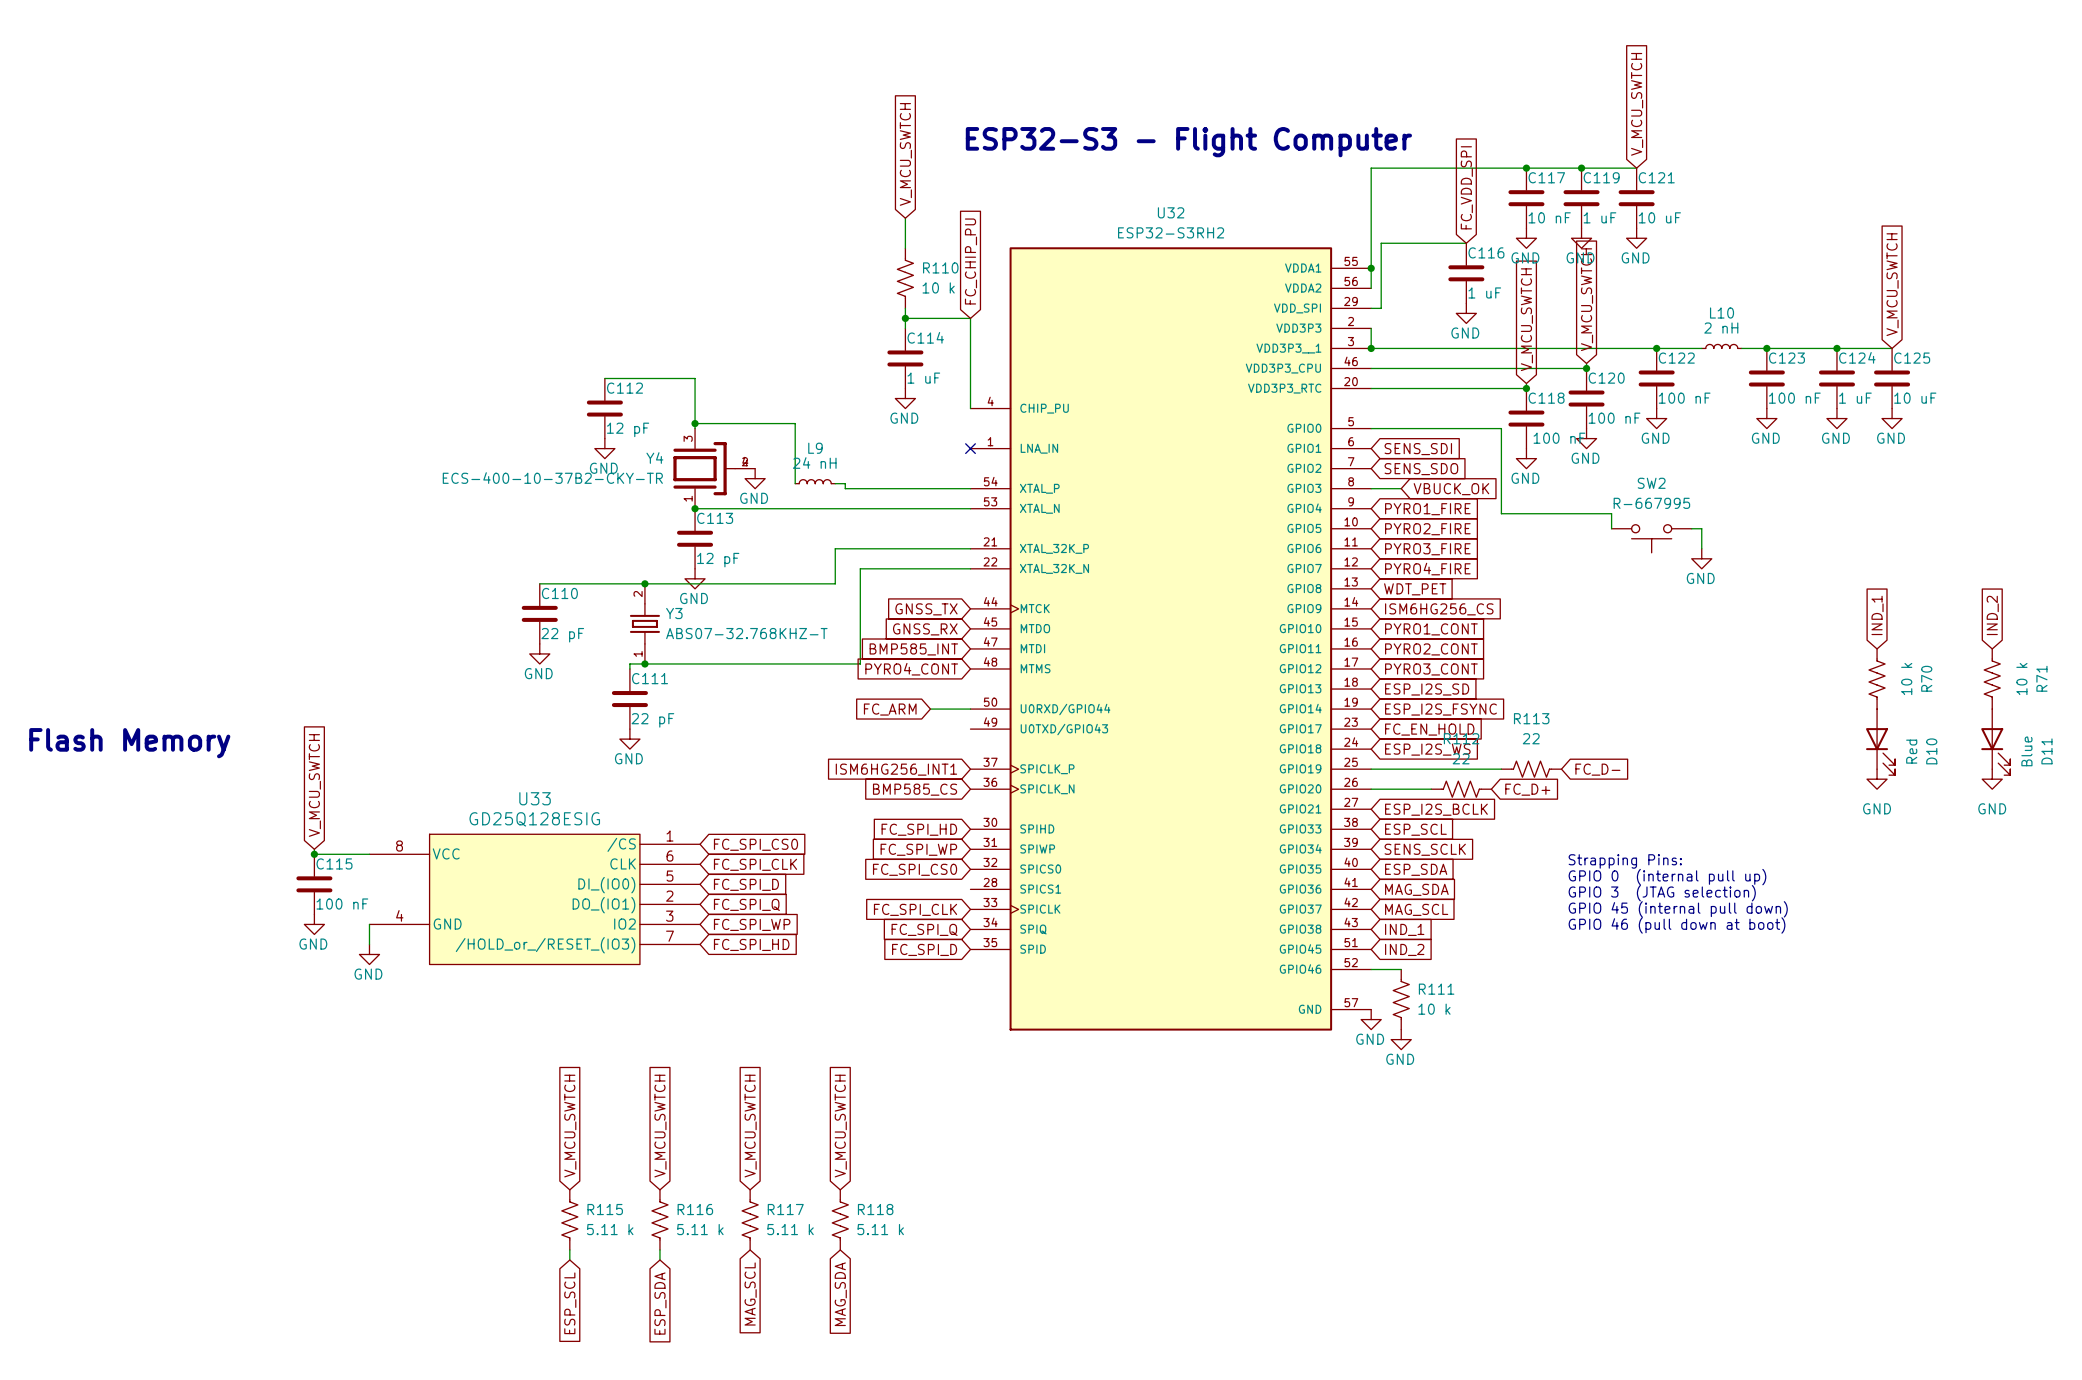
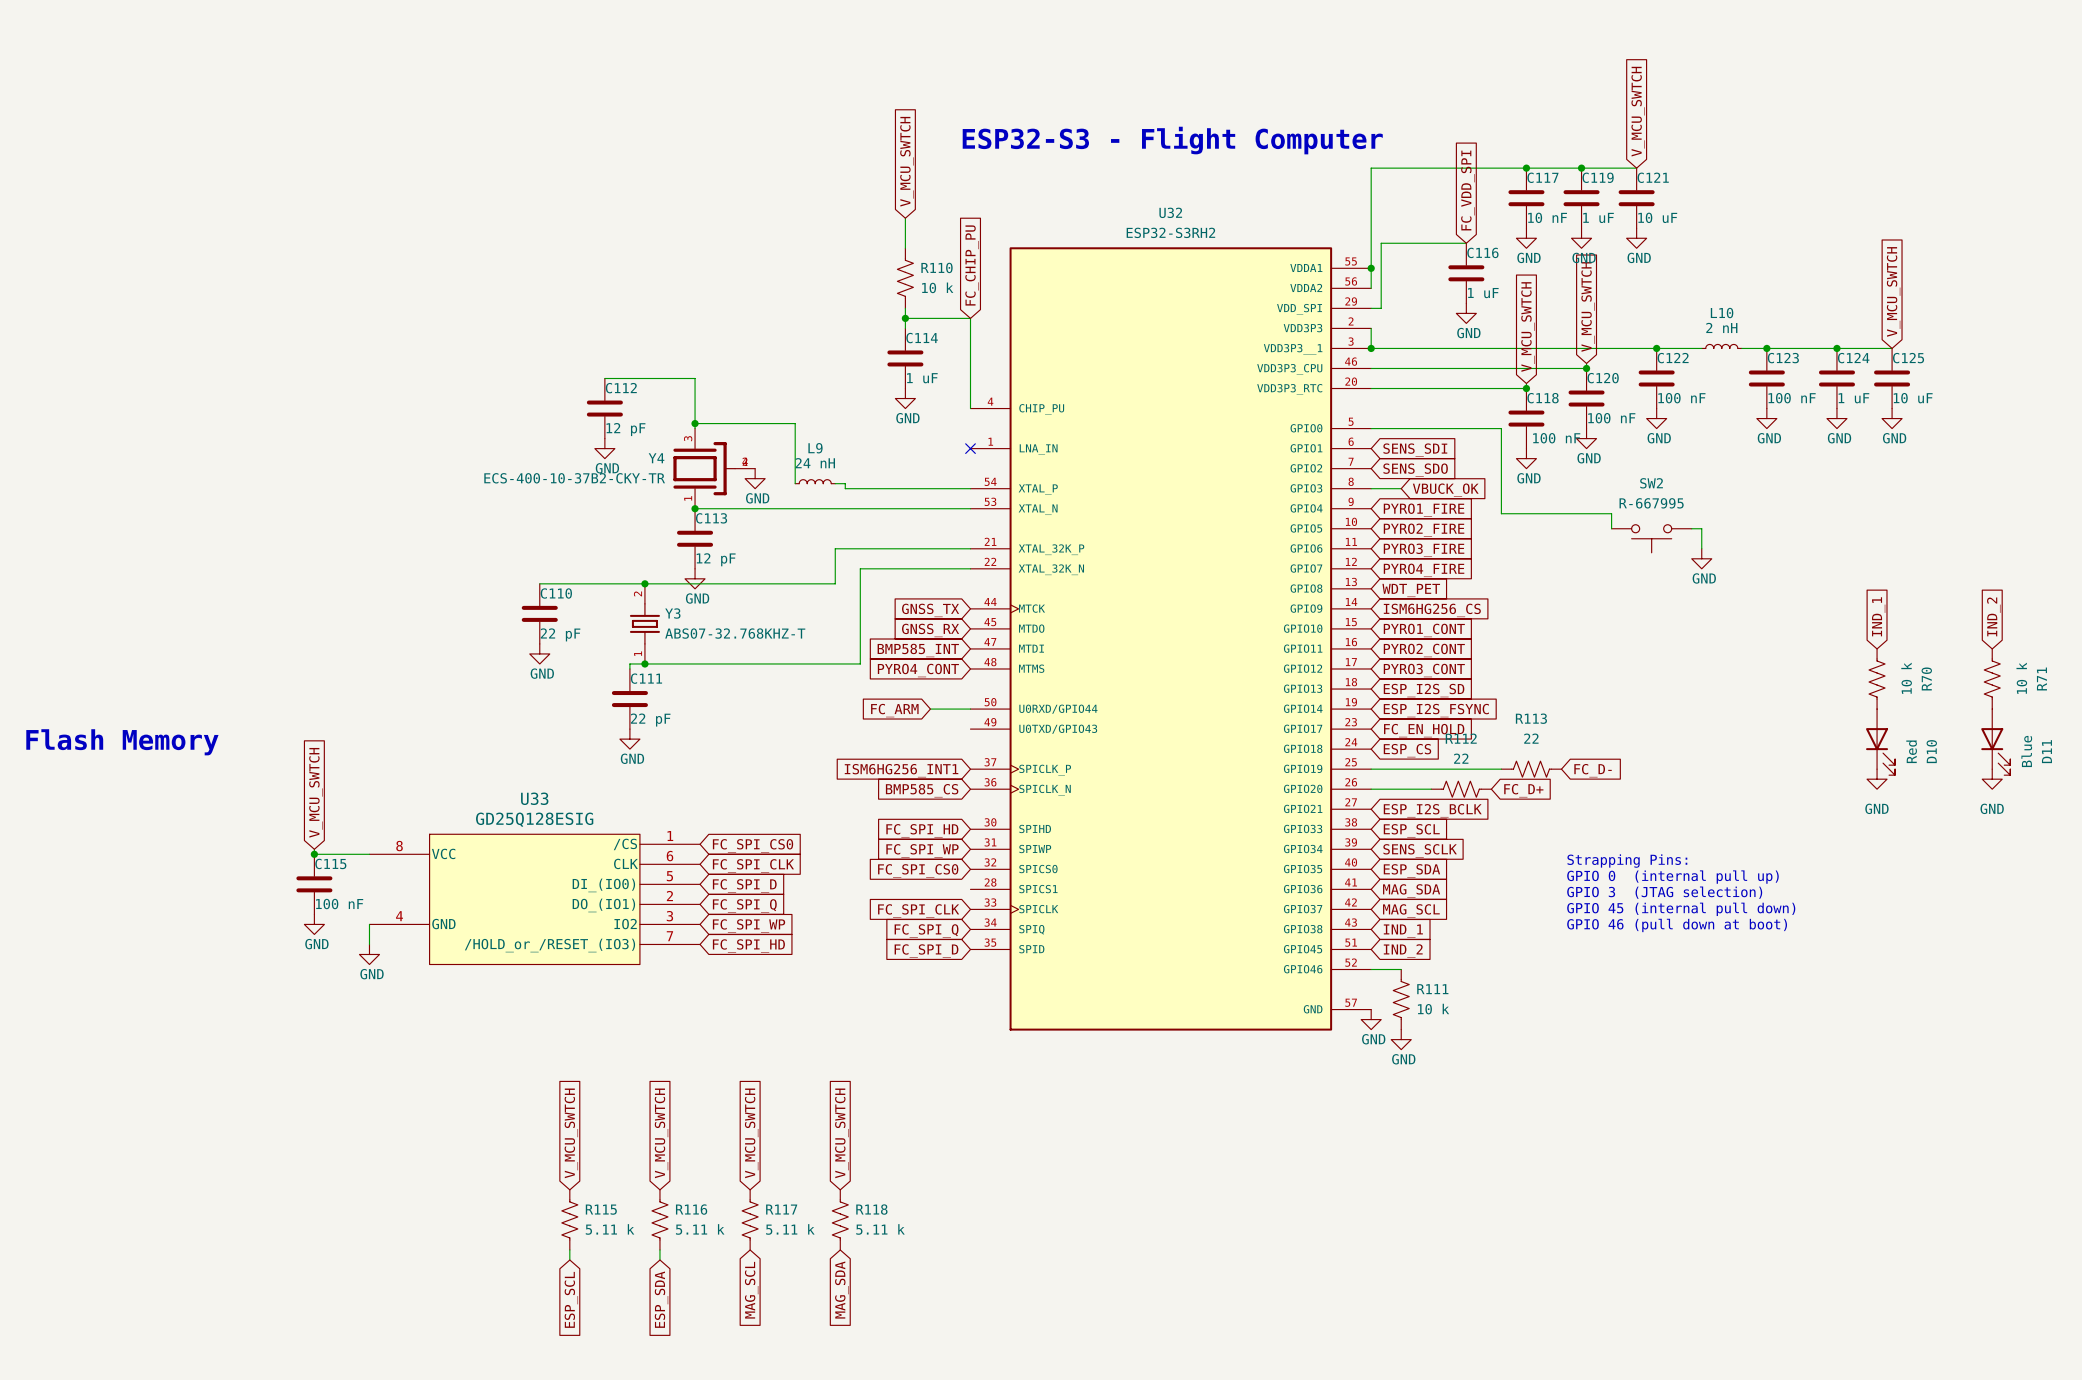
global label: ESP_I2S_WS (1427, 749) -> ESP_CS (1407, 750)

